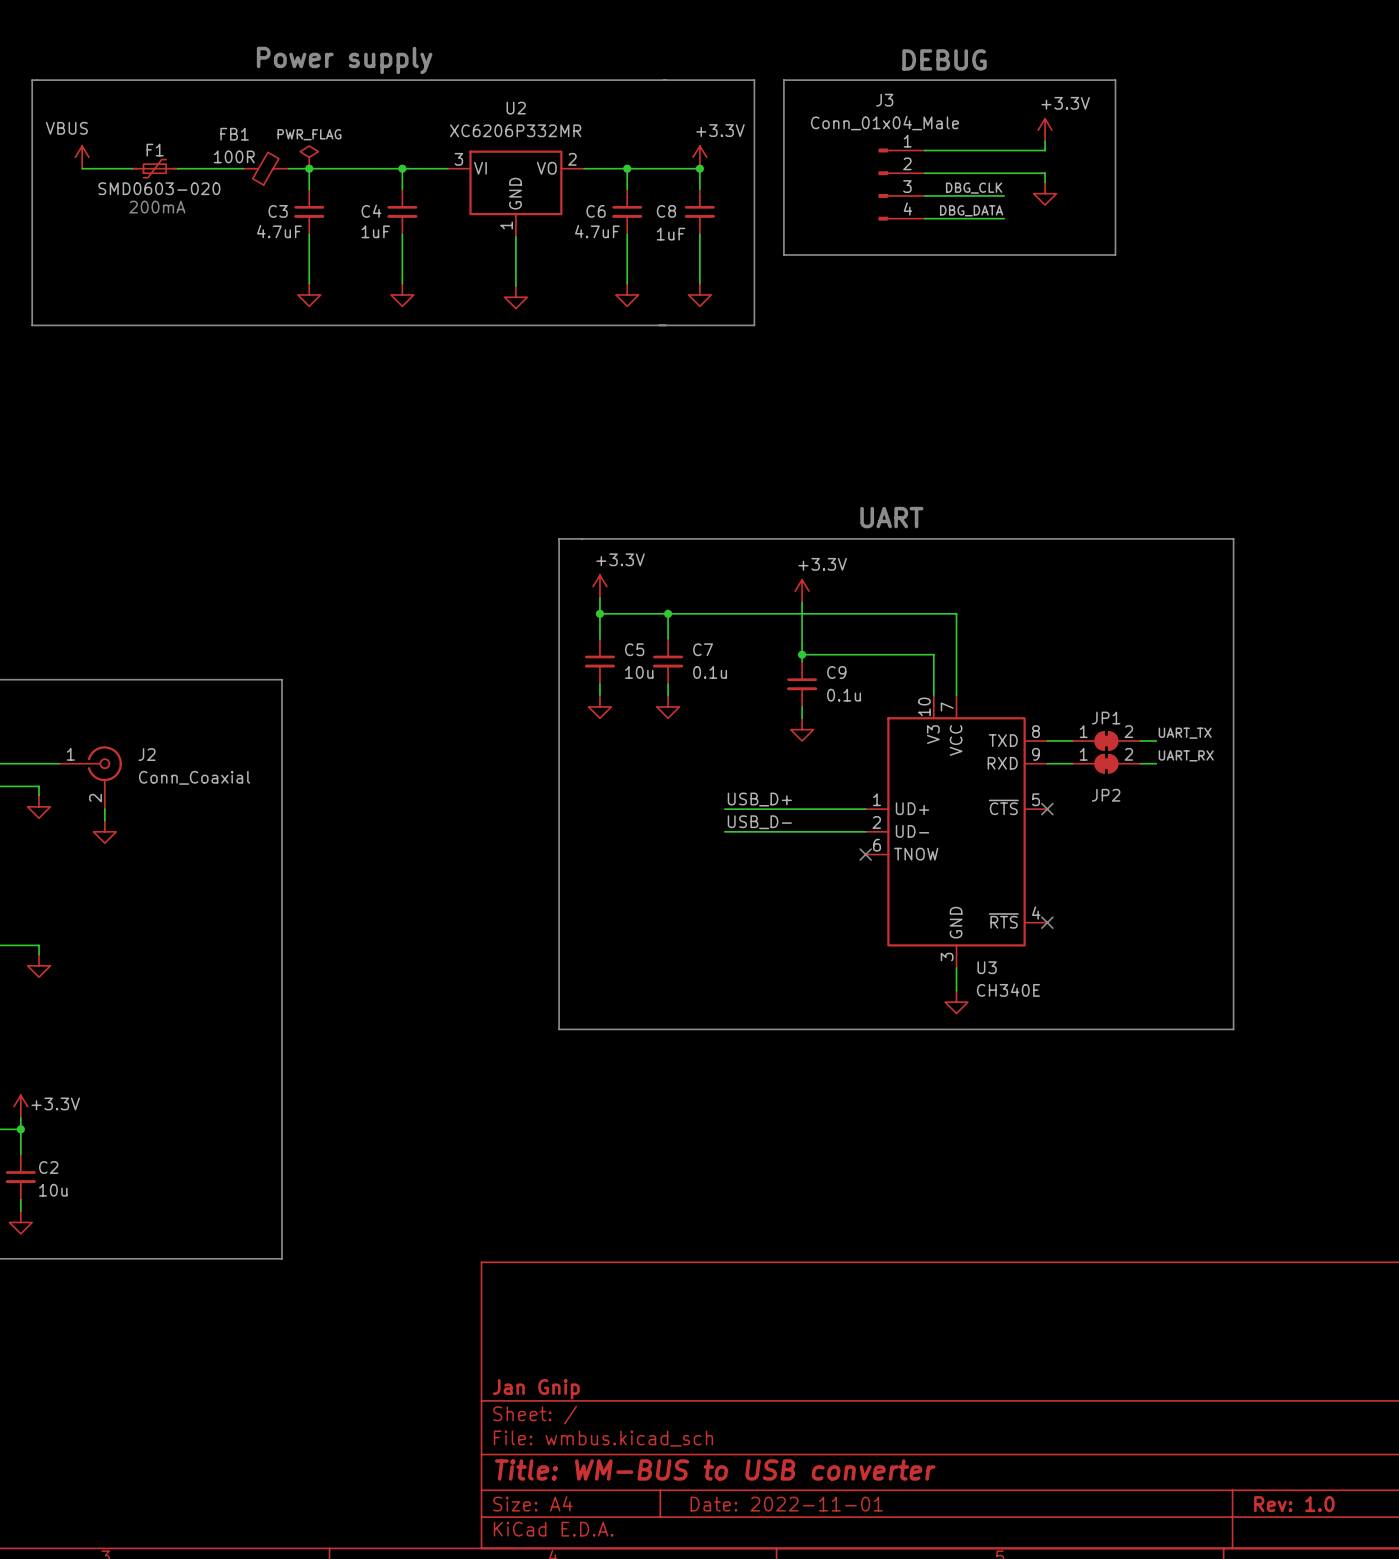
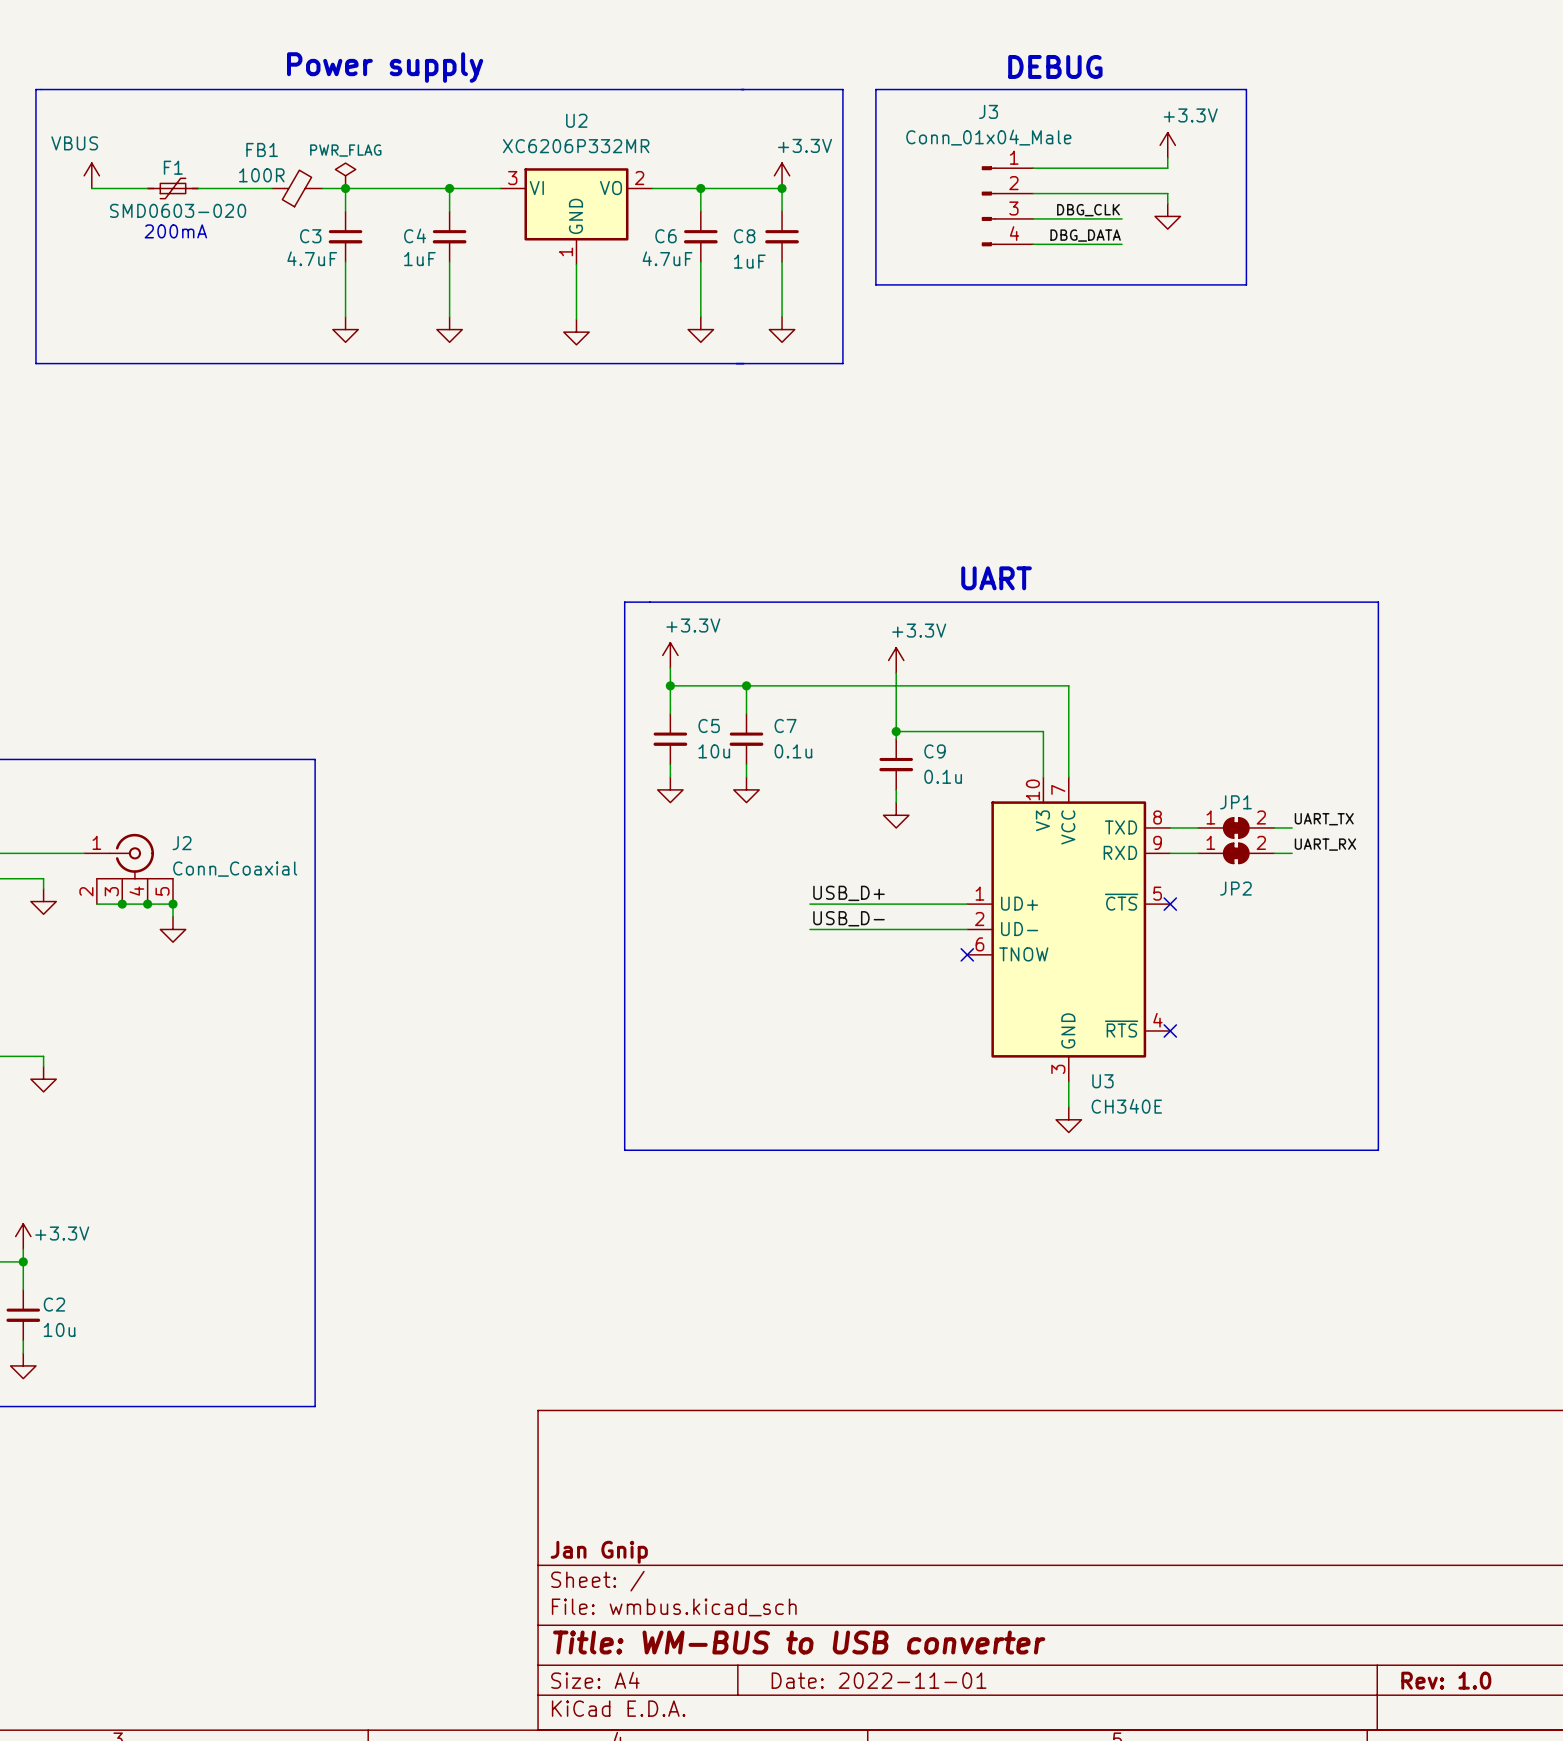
J2 symbol: [59, 746, 122, 810] -> [84, 833, 174, 905]
wire: none -> (96, 904) (173, 904) (173, 916)
wire: (104, 809) (104, 820) -> none
junction: none -> (122, 904)
junction: none -> (147, 904)
junction: none -> (173, 904)
power symbol position: (104, 831) -> (173, 929)

